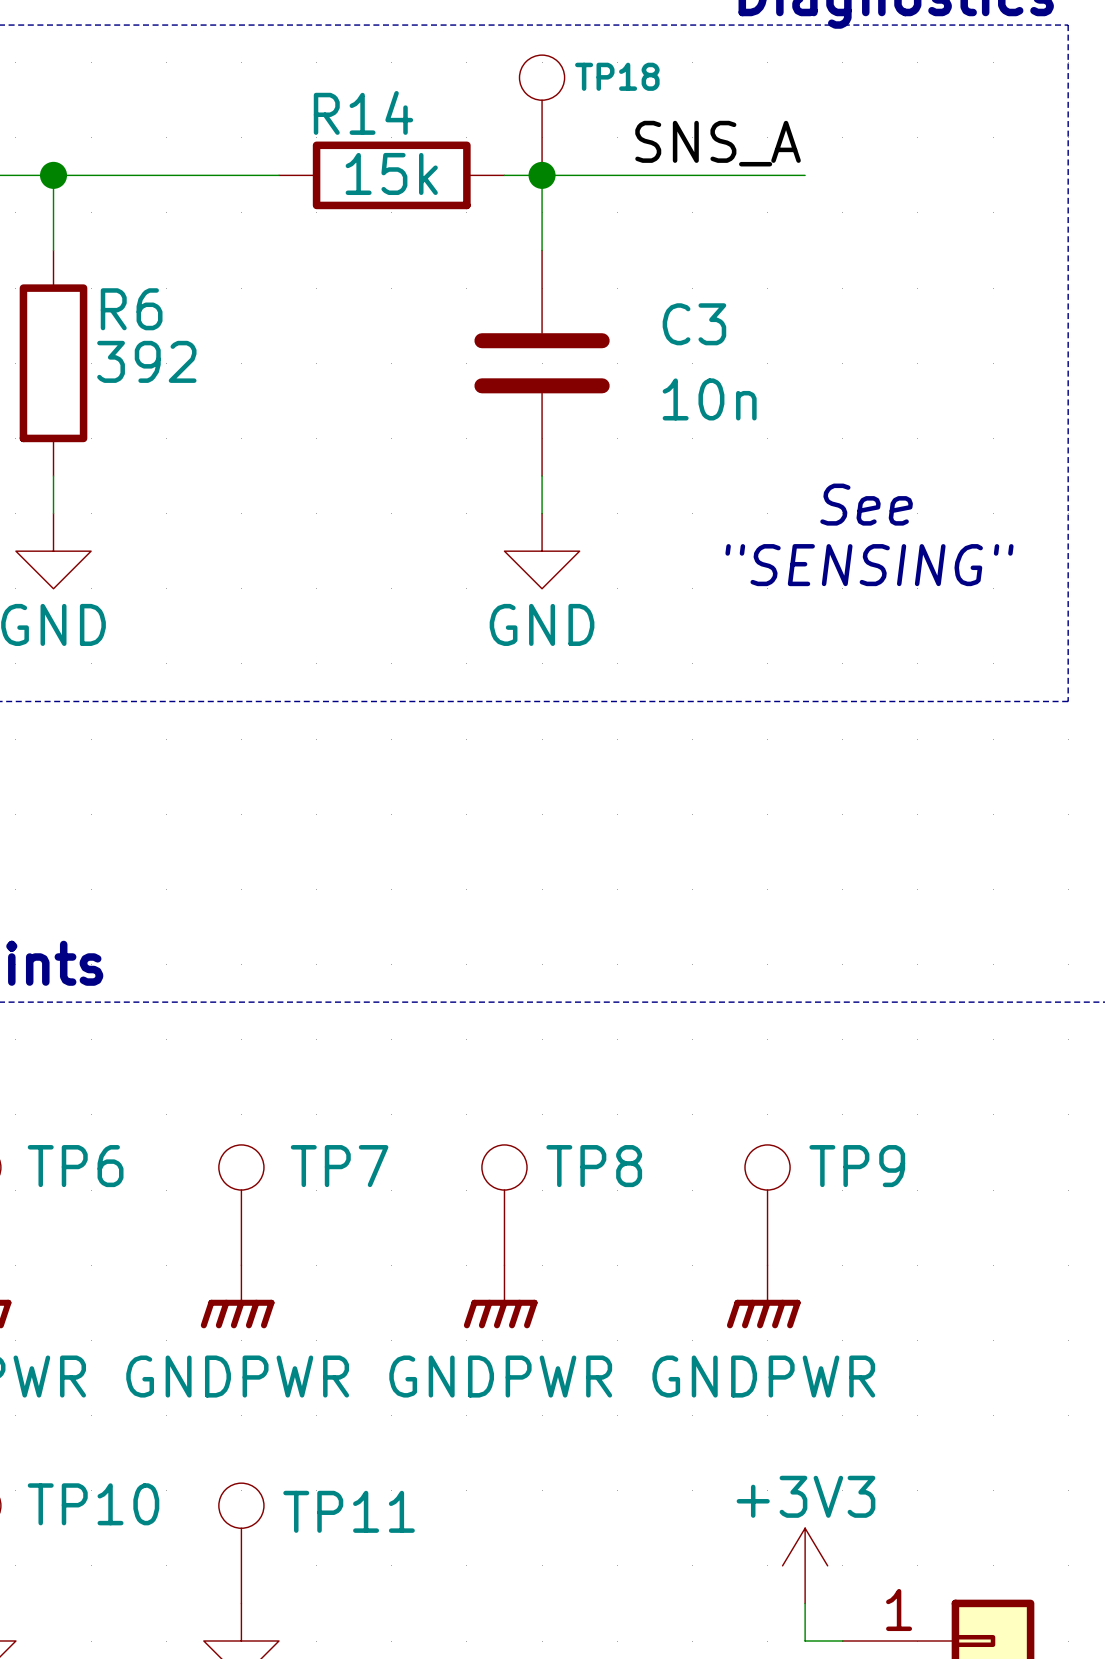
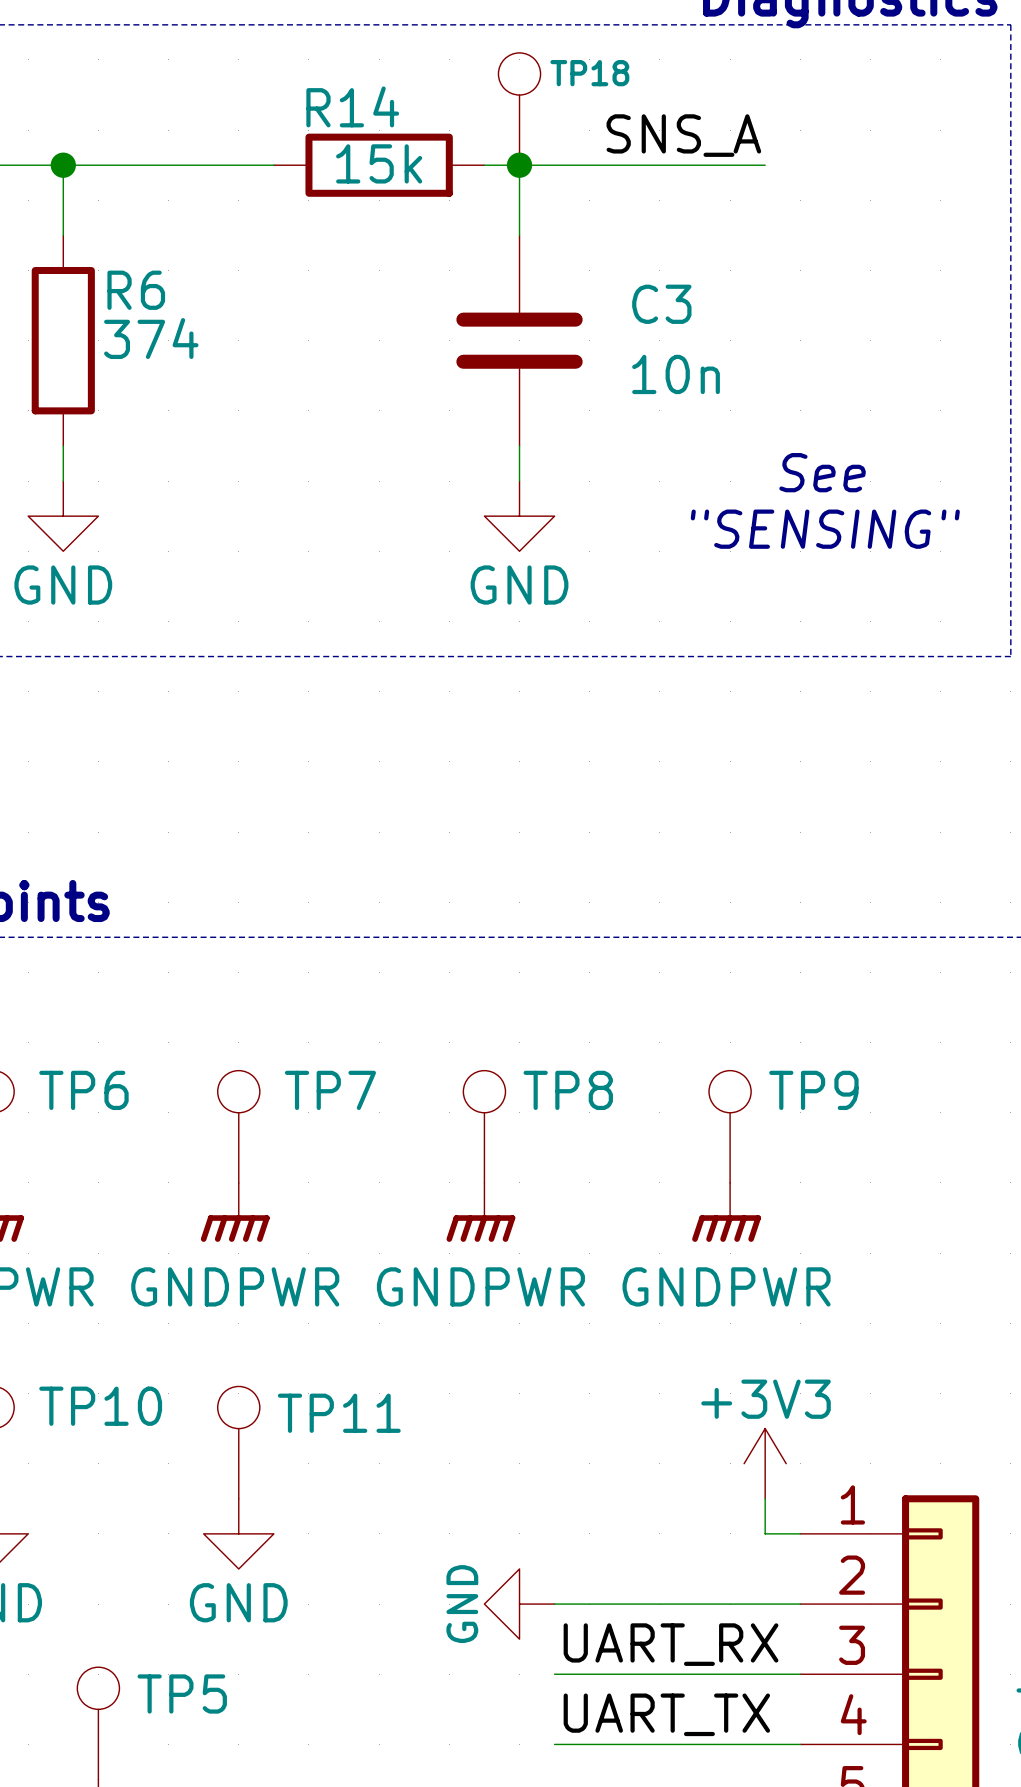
R6 value: 392 (146, 361) -> 374 (151, 338)

